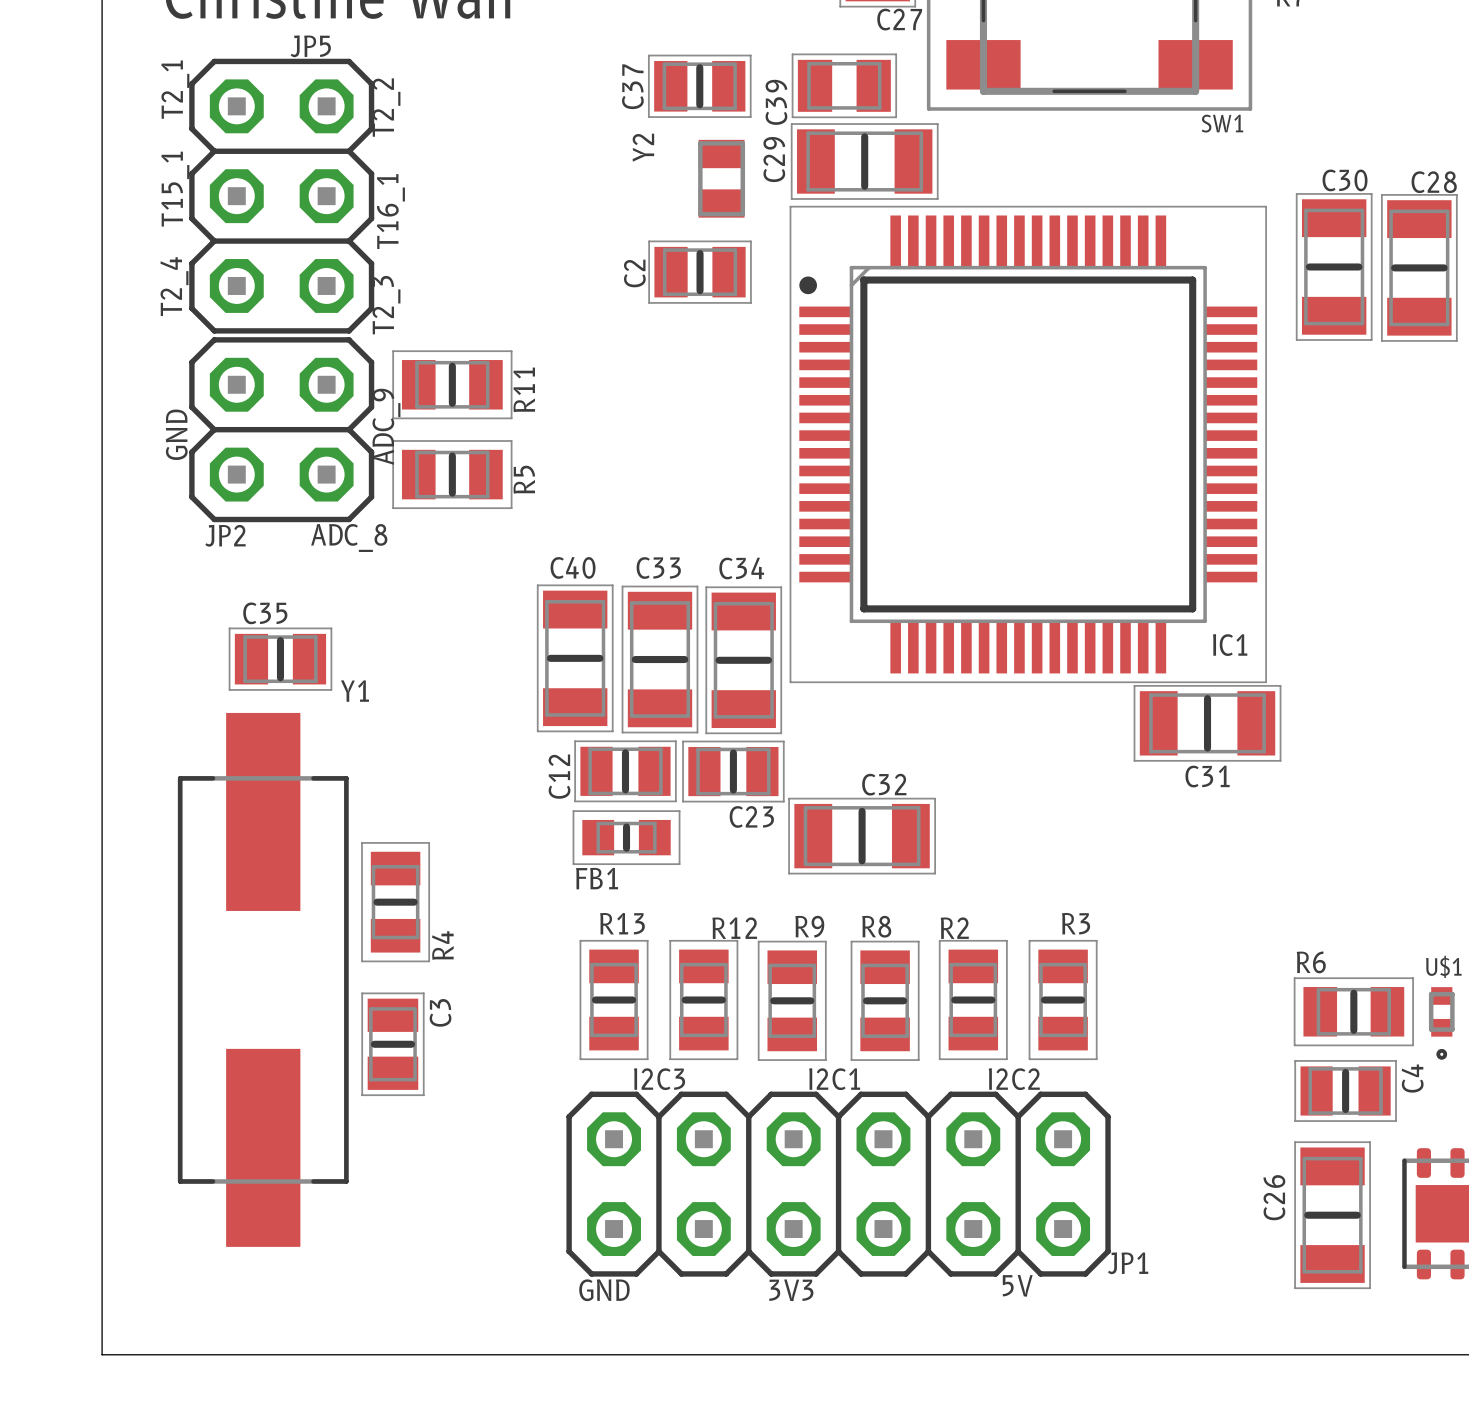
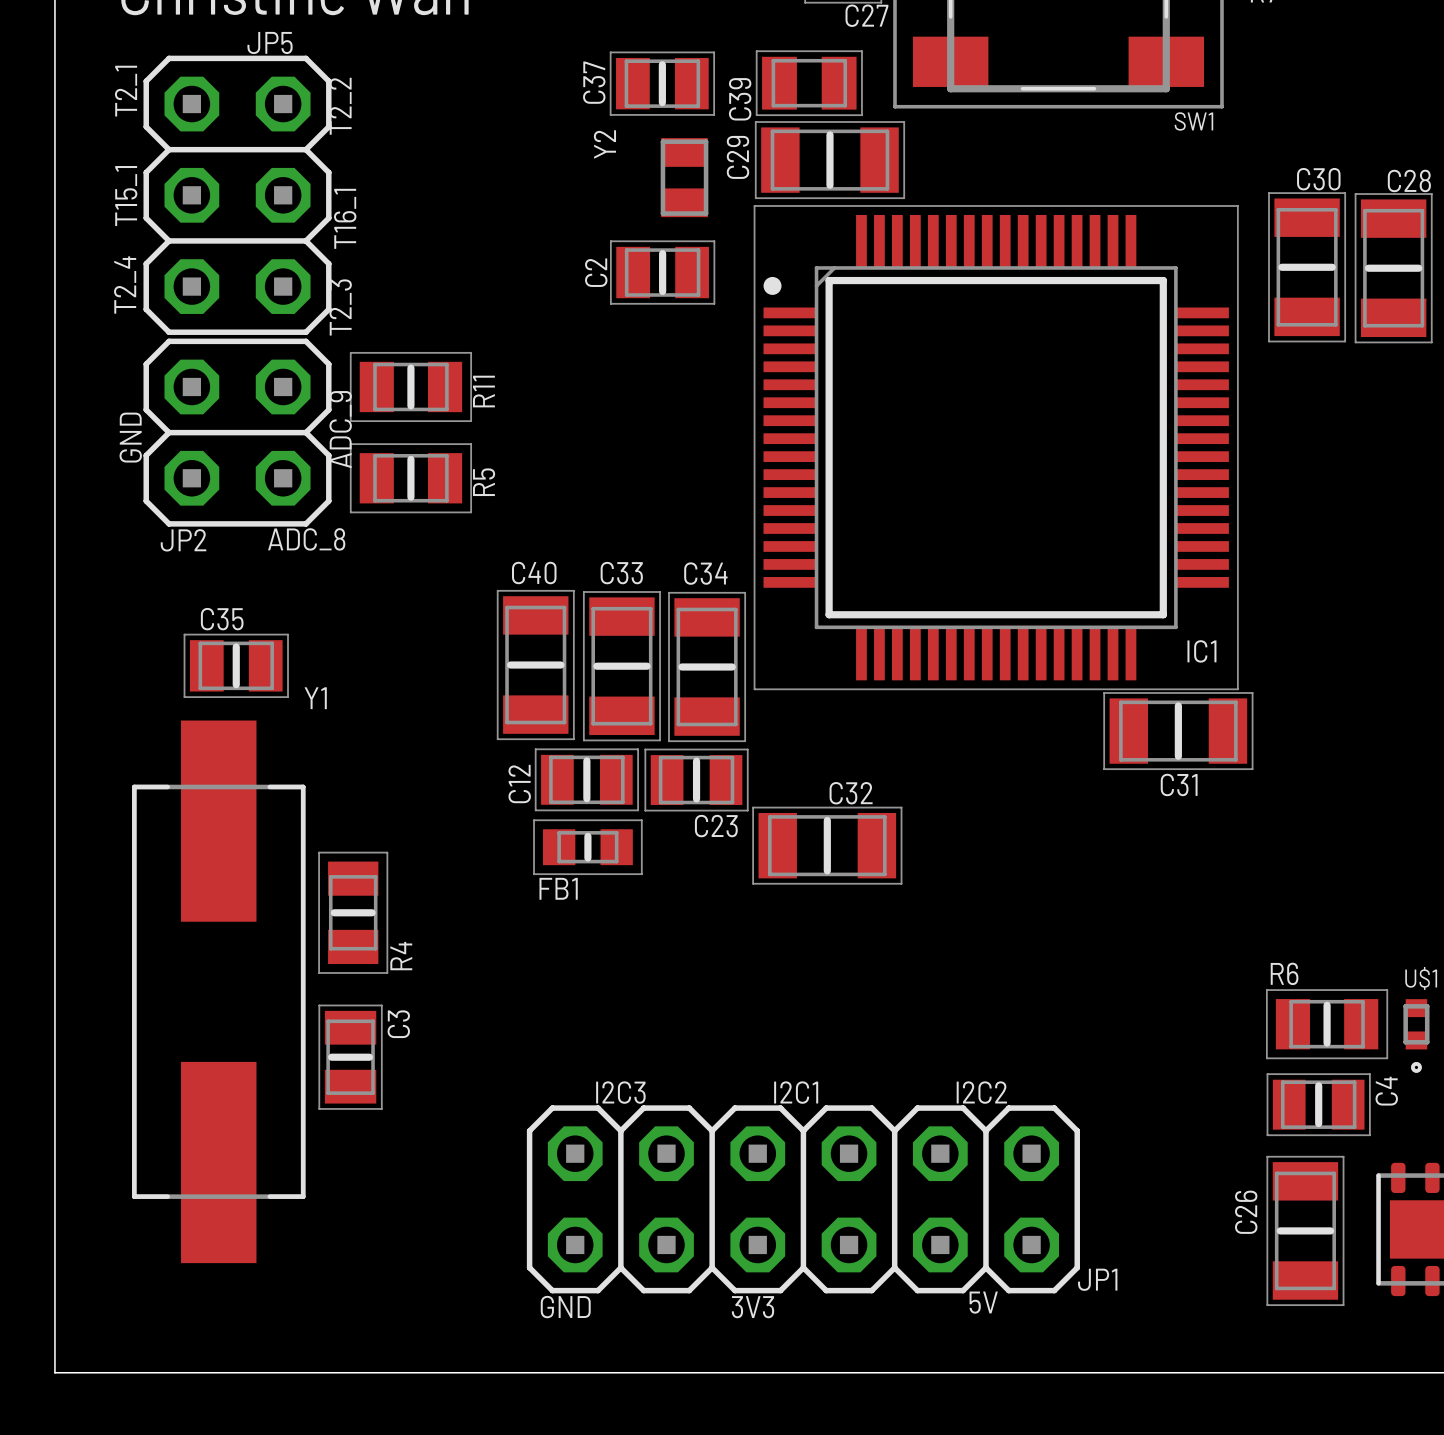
R13: (614, 1000) -> none
R12: (703, 1000) -> none
R9: (792, 1000) -> none
R8: (885, 1000) -> none
R2: (973, 1000) -> none
R3: (1063, 1000) -> none

